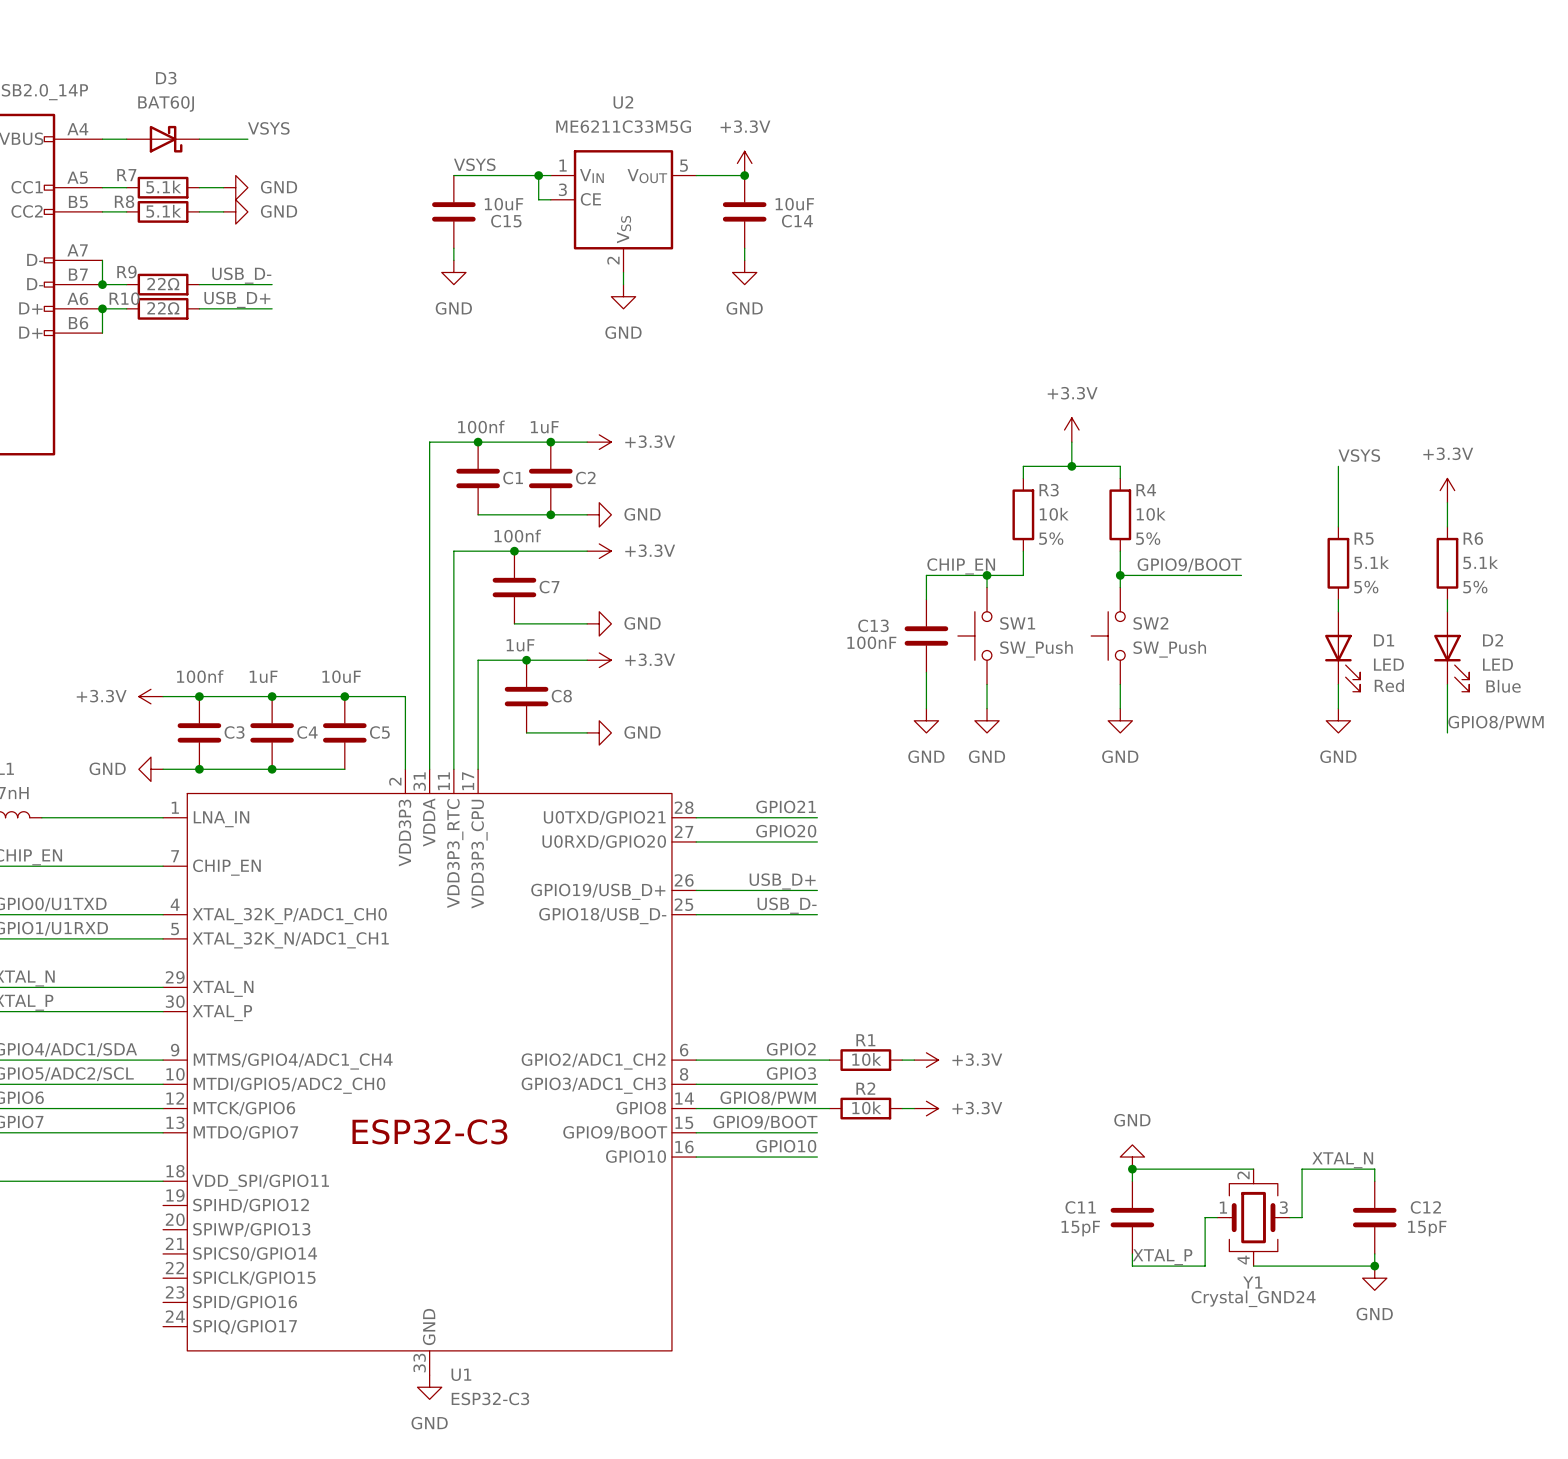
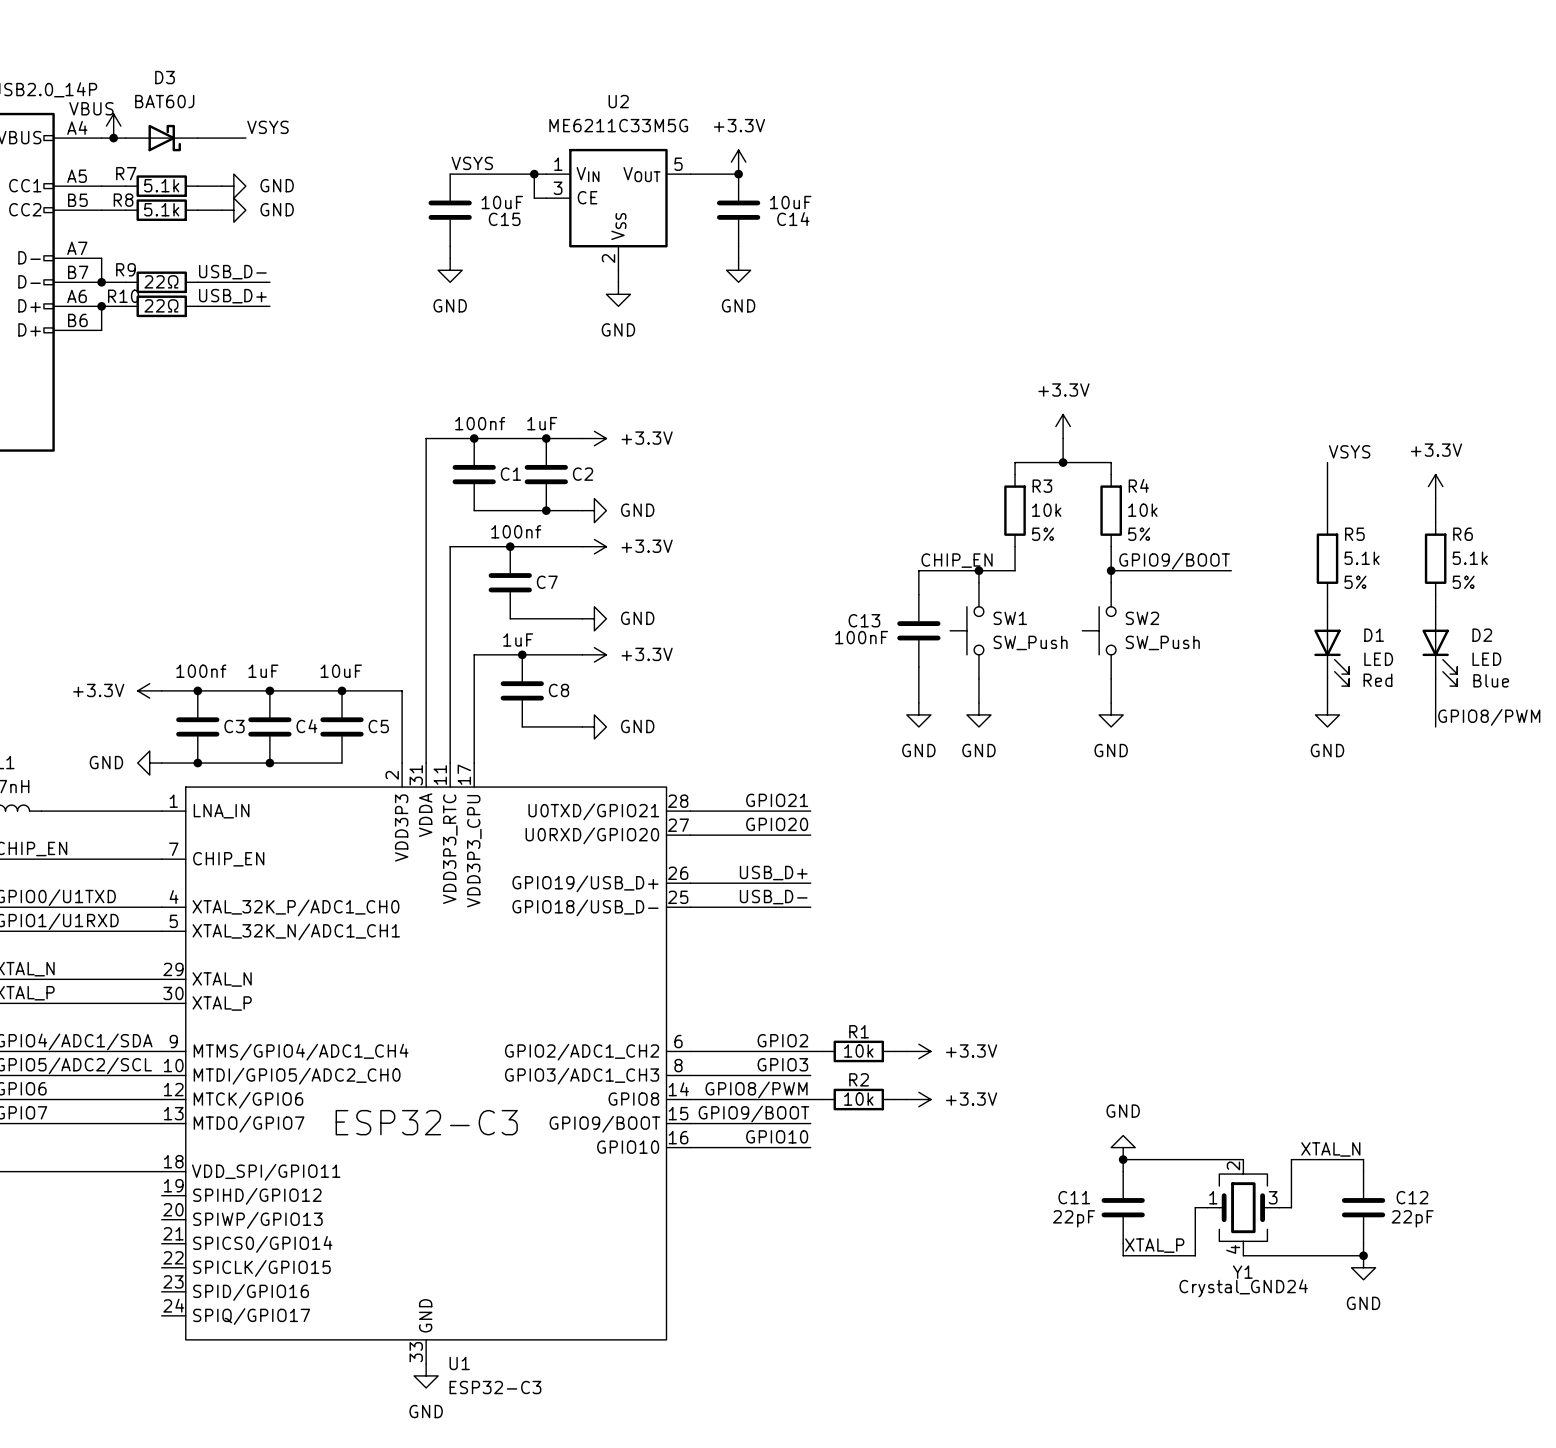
power symbol: none -> VBUS (113, 126)
junction: none -> (113, 138)
C11 value: 15pF (1080, 1228) -> 22pF (1074, 1218)
C12 value: 15pF (1427, 1228) -> 22pF (1412, 1218)

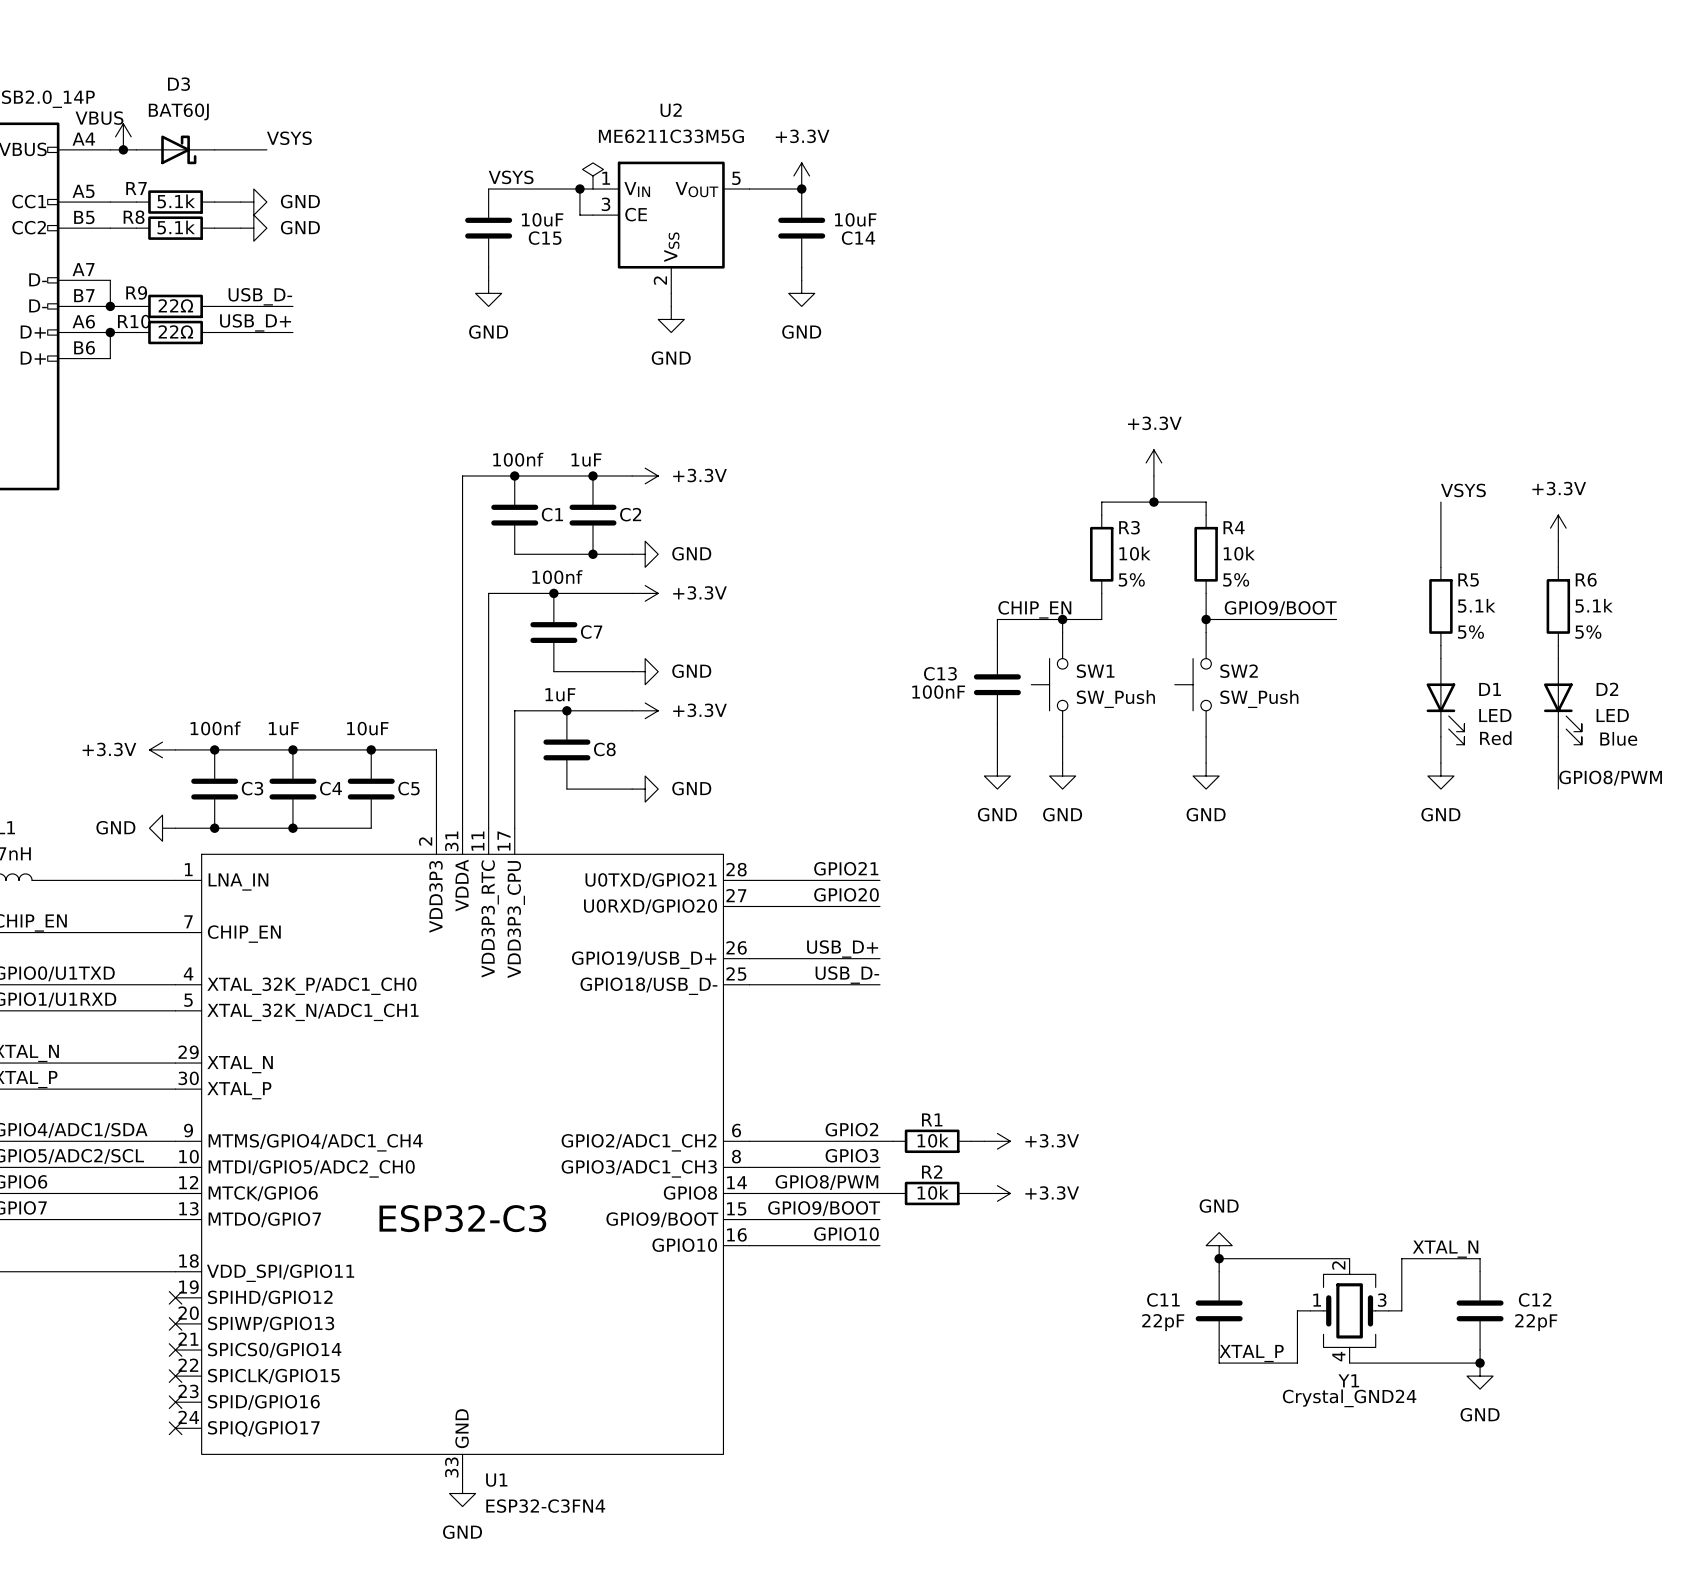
power symbol: none -> (593, 175)
no-connect mark: none -> (175, 1297)
no-connect mark: none -> (175, 1323)
no-connect mark: none -> (175, 1350)
no-connect mark: none -> (175, 1376)
no-connect mark: none -> (175, 1402)
no-connect mark: none -> (175, 1428)
U1 value: ESP32-C3 (495, 1387) -> ESP32-C3FN4 (545, 1506)

